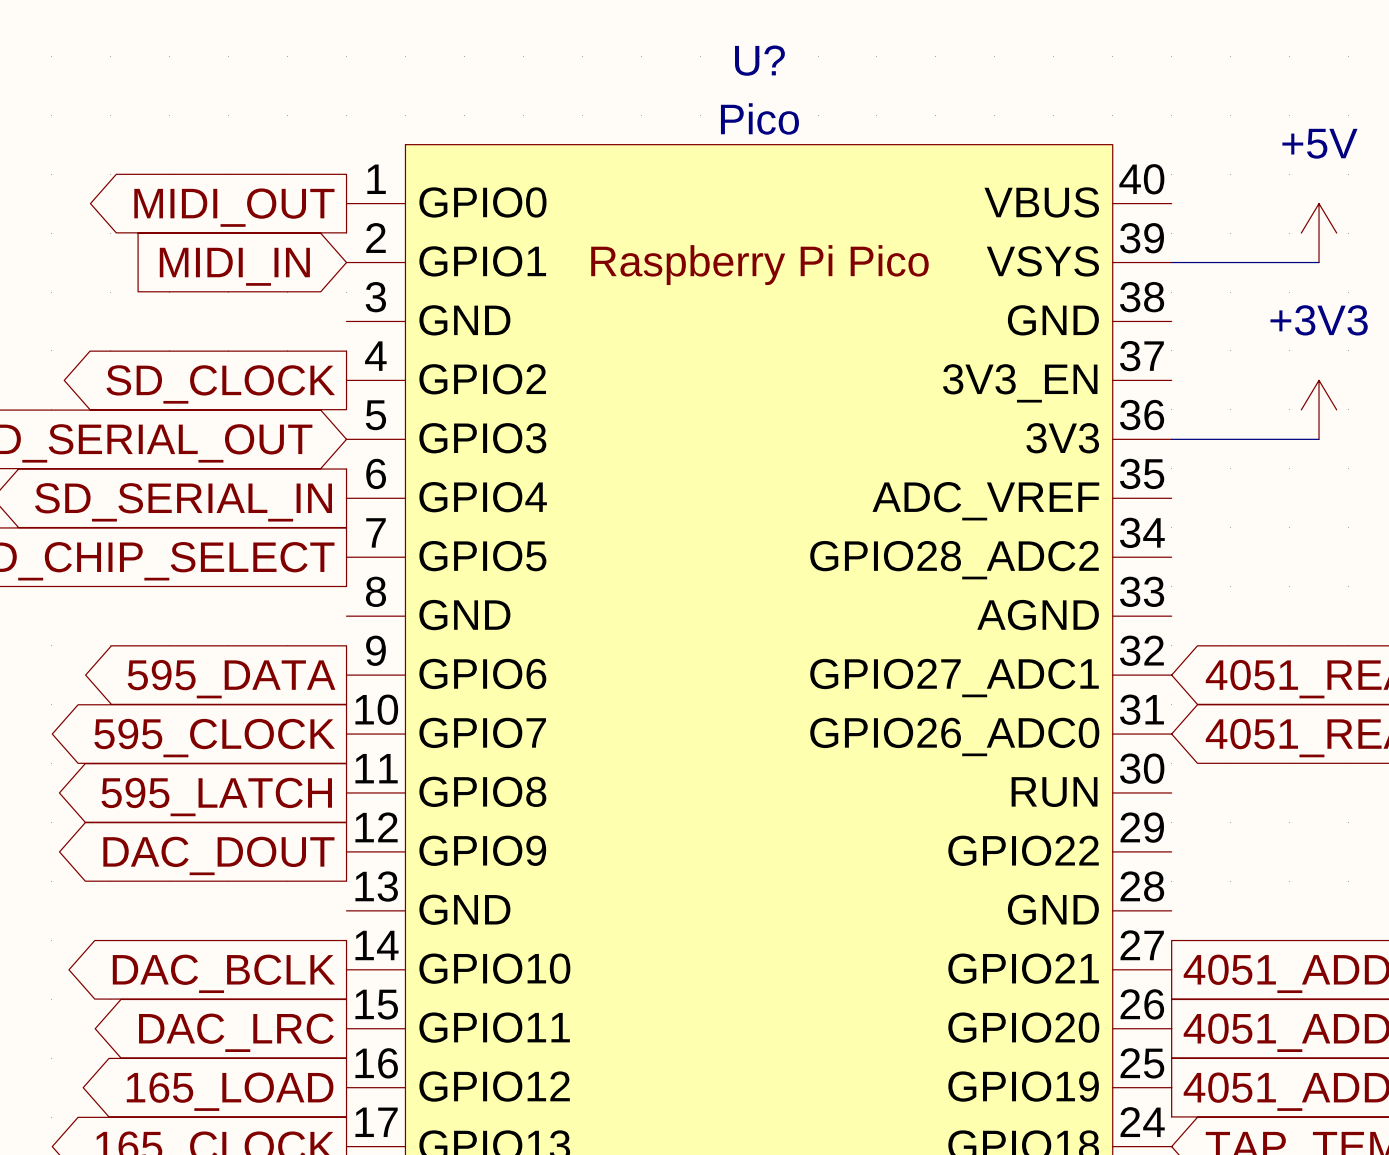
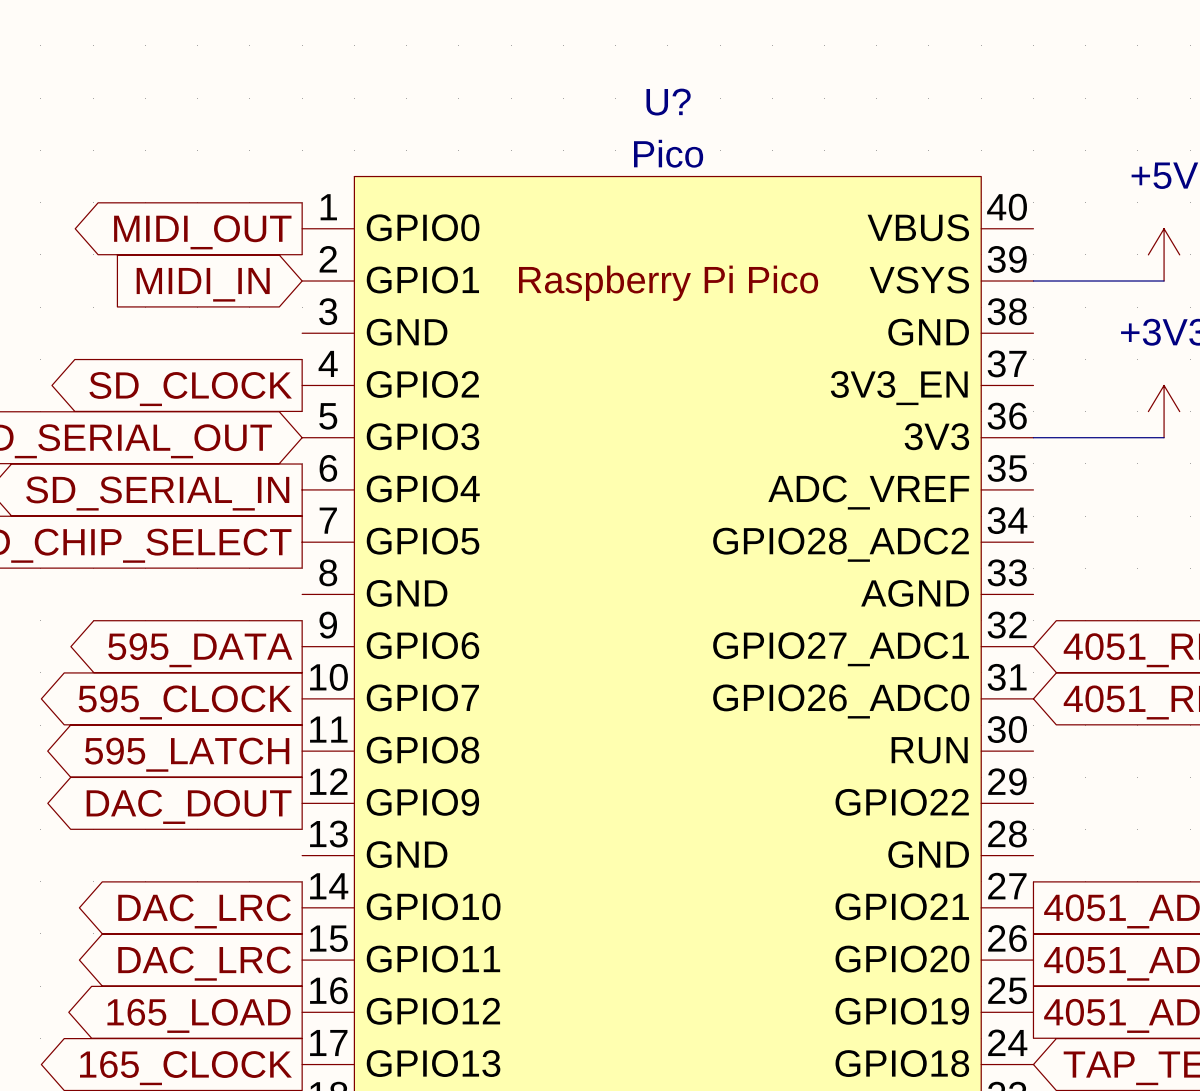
global label: DAC_BCLK (223, 973) -> DAC_LRC (204, 911)

